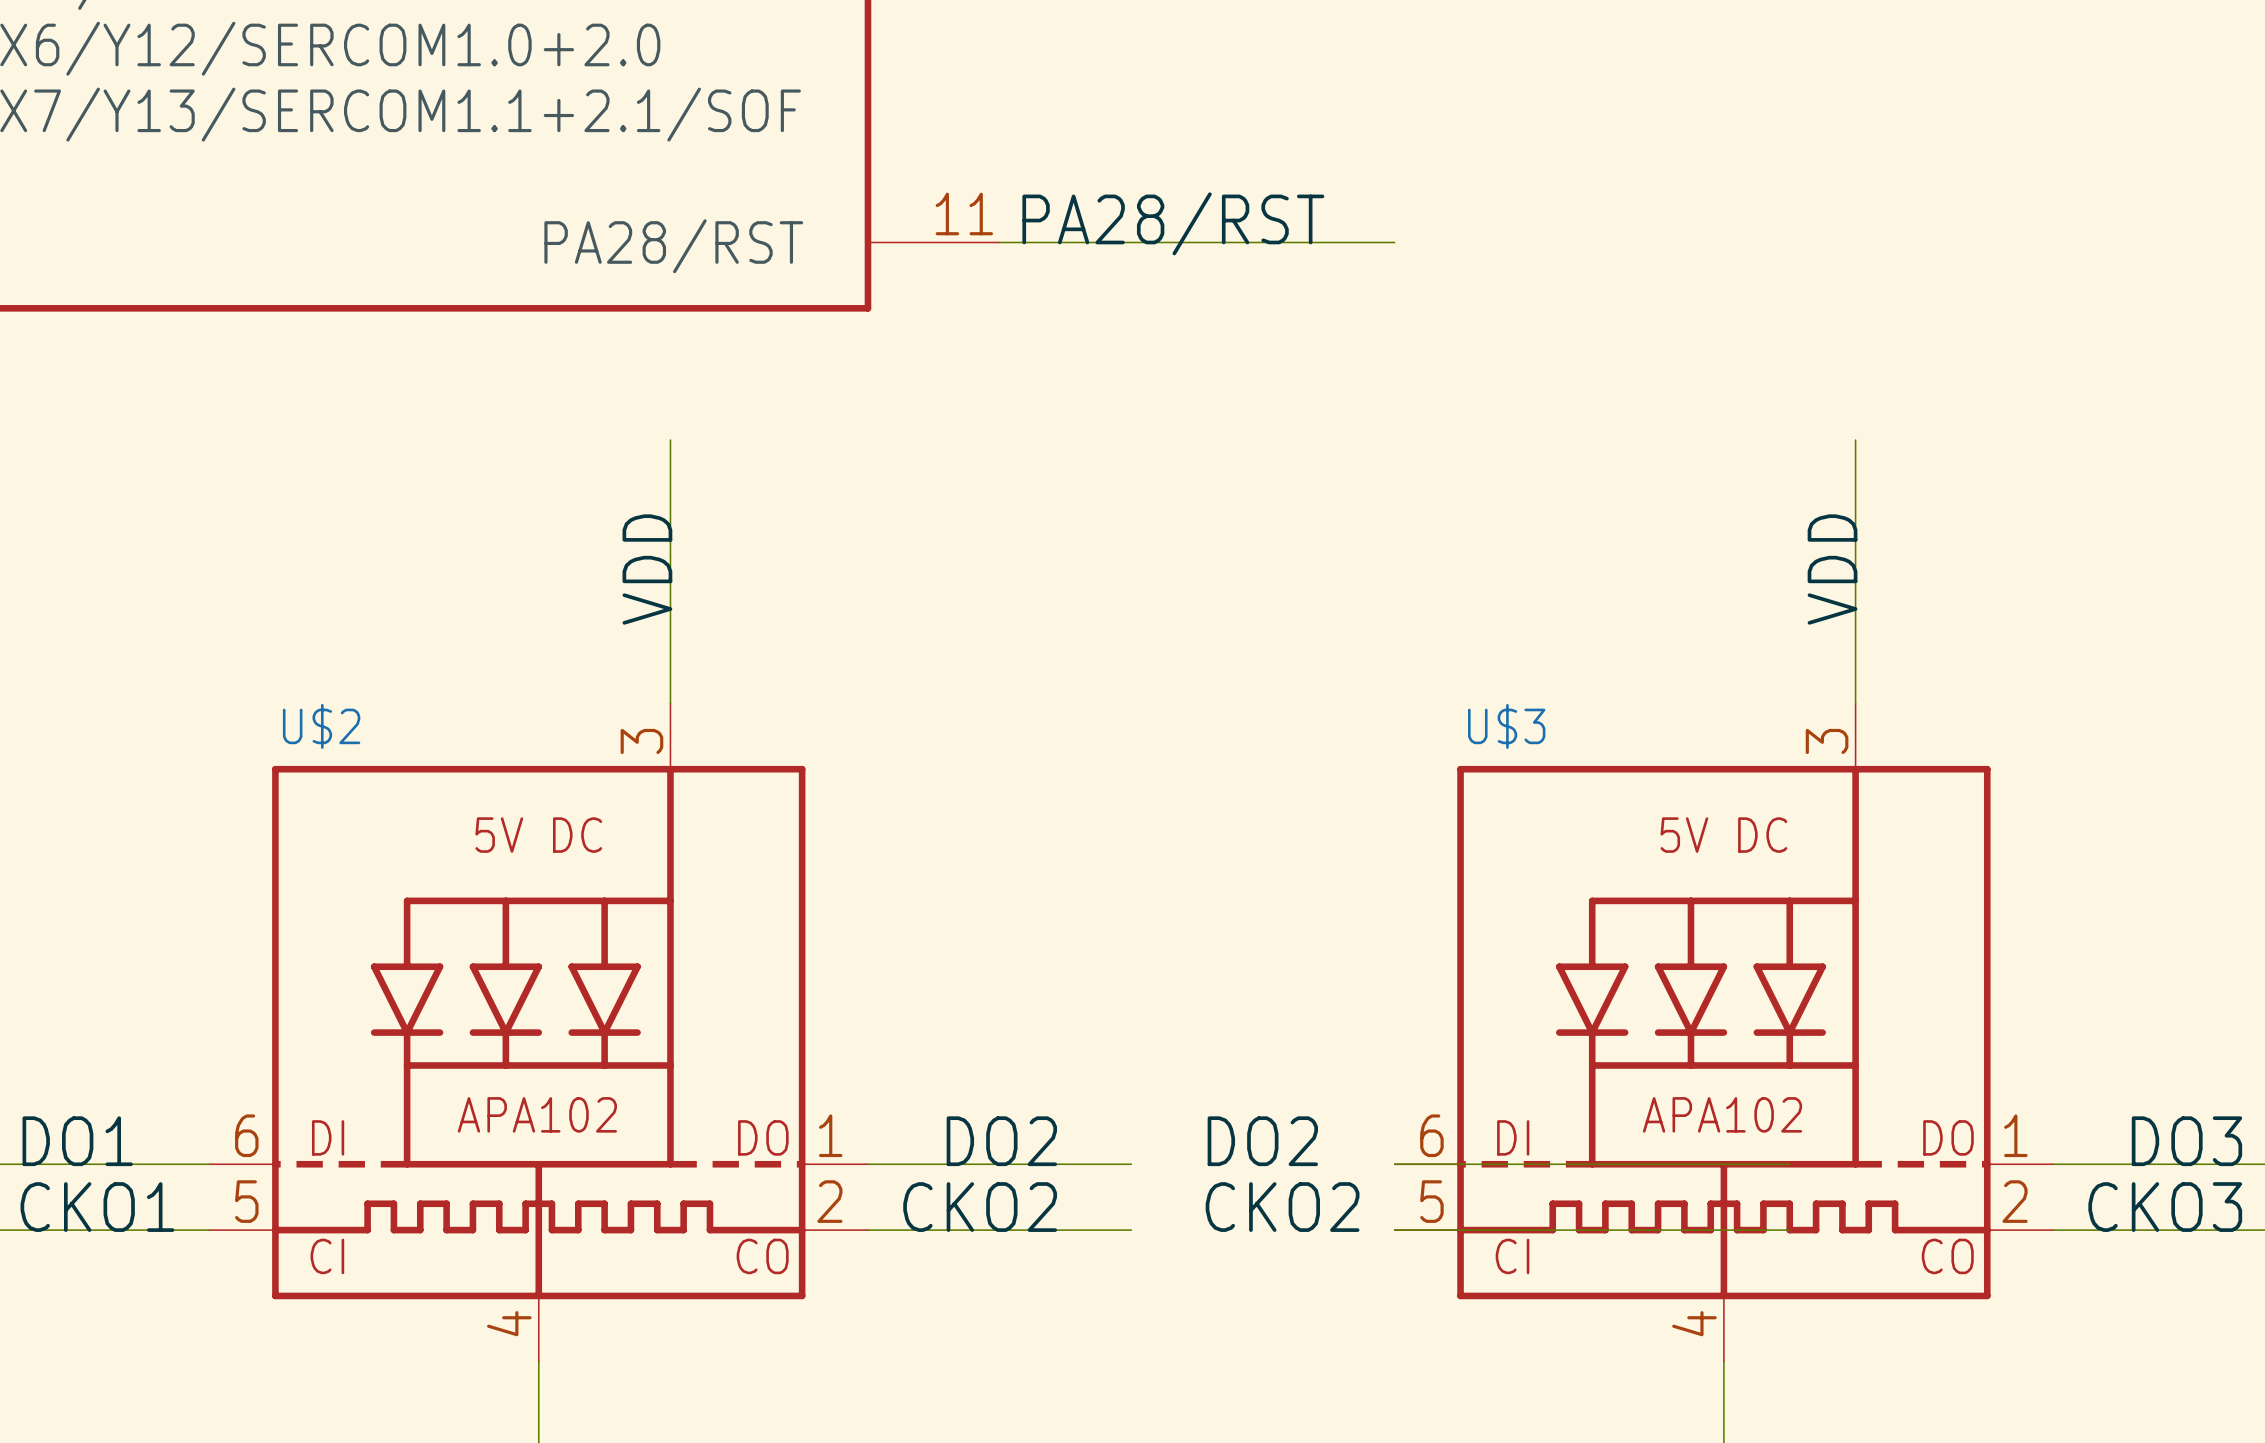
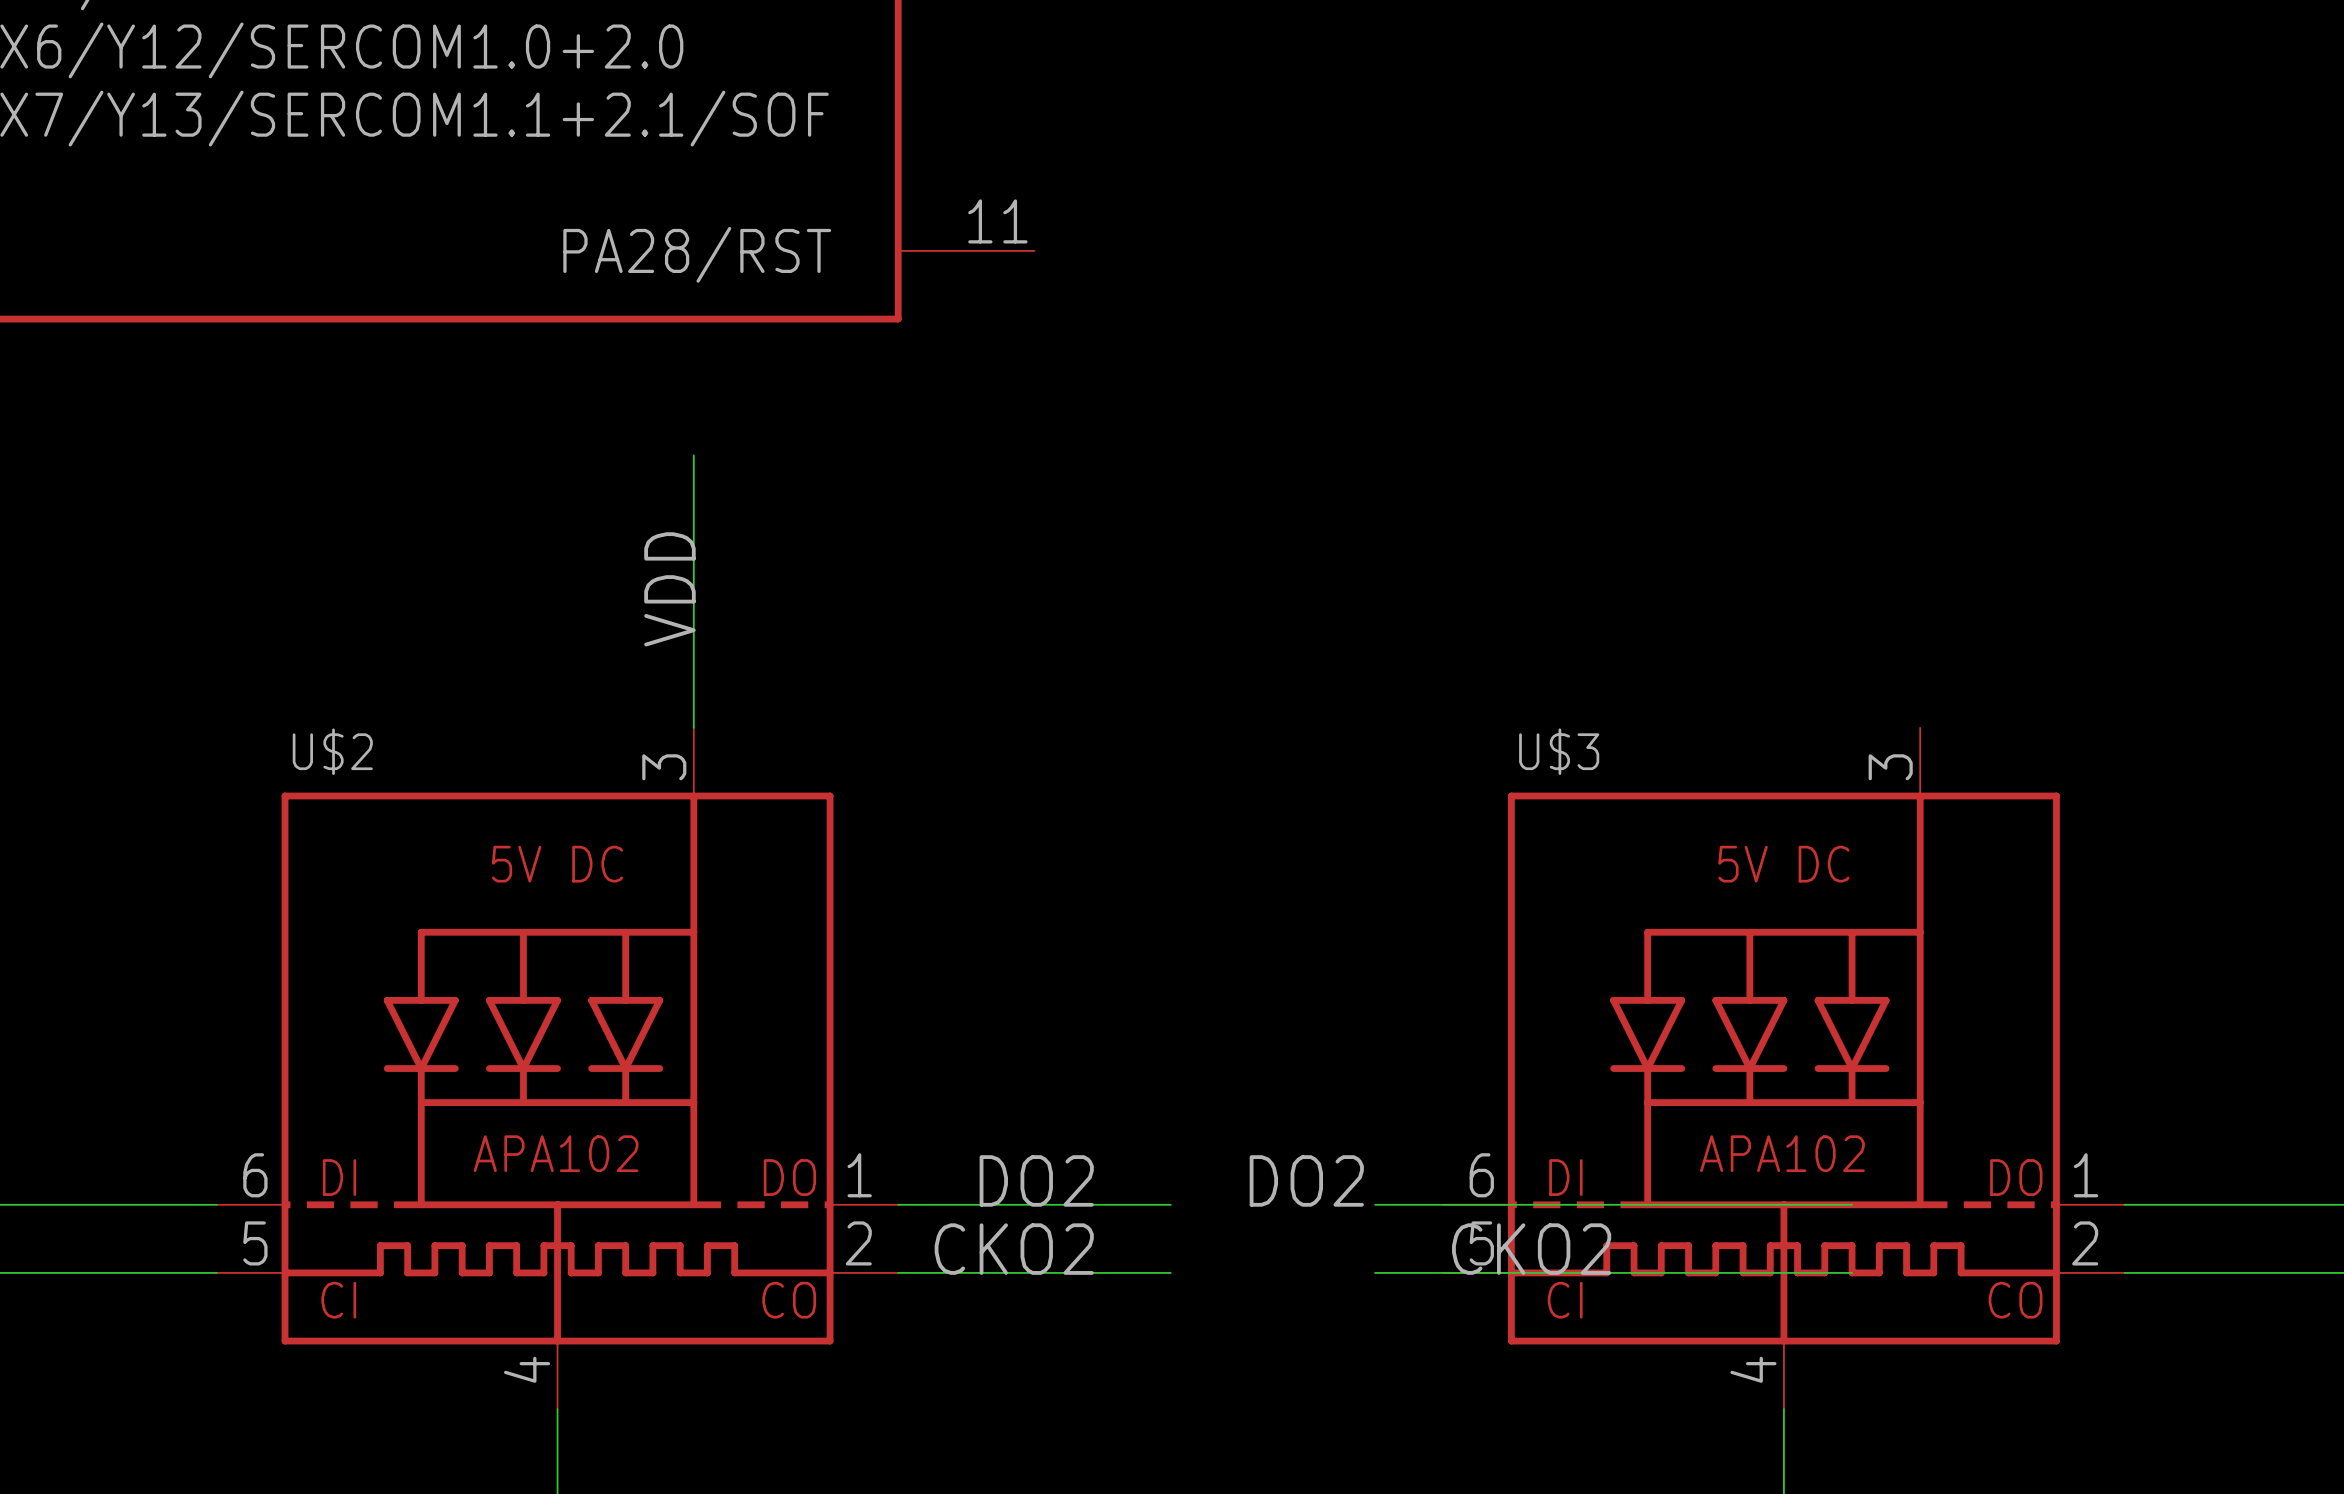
label: PA28/RST (1173, 223) -> none
wire: (999, 242) (1394, 242) -> none
wire: (1855, 440) (1855, 703) -> none
label: VDD (1832, 569) -> none
label: DO1 (77, 1141) -> none
label: DO3 (2186, 1141) -> none
wire: none -> (1375, 1204) (1443, 1204)
label: CKO1 (97, 1207) -> none
label position: CKO2 (1282, 1207) -> CKO2 (1531, 1249)
label: CKO3 (2165, 1207) -> none
wire: none -> (1375, 1272) (1443, 1272)

